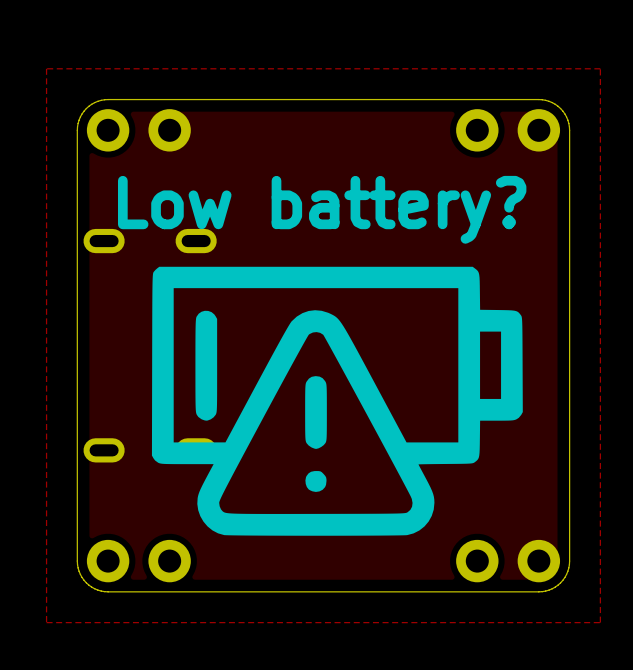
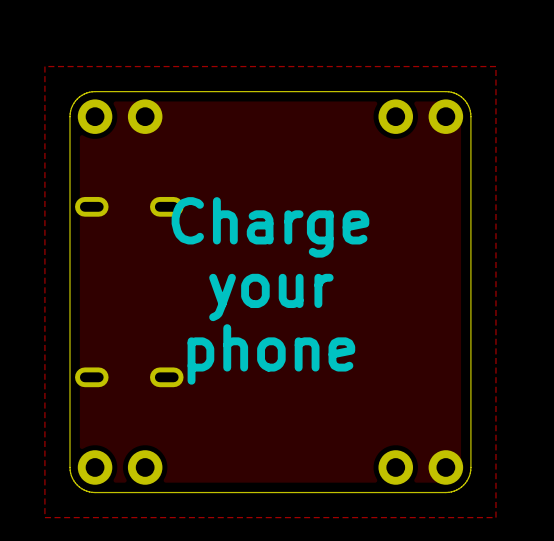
text: Low battery? (322, 209) -> none
drawing: [151, 266, 523, 536] -> none
text: none -> Charge (270, 227)
text: none -> your (271, 297)
text: none -> phone (271, 354)

